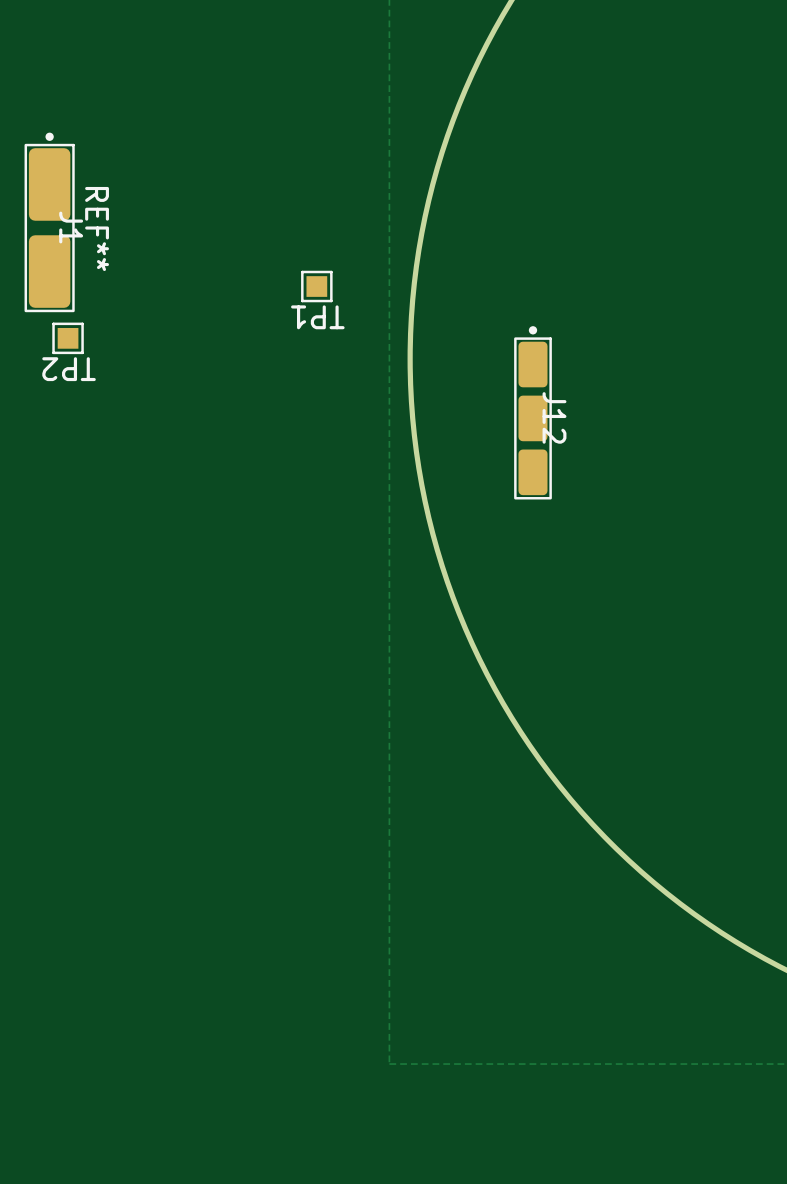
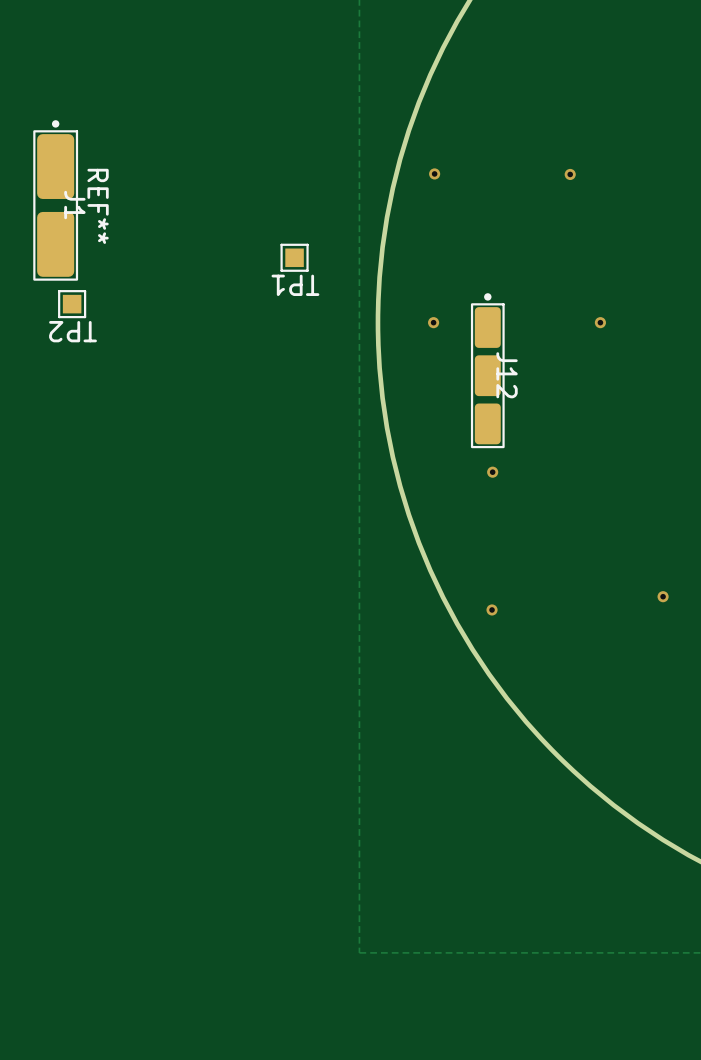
via: none -> (434, 173)
via: none -> (570, 174)
via: none -> (433, 322)
via: none -> (600, 322)
via: none -> (492, 472)
via: none -> (663, 596)
via: none -> (492, 609)

